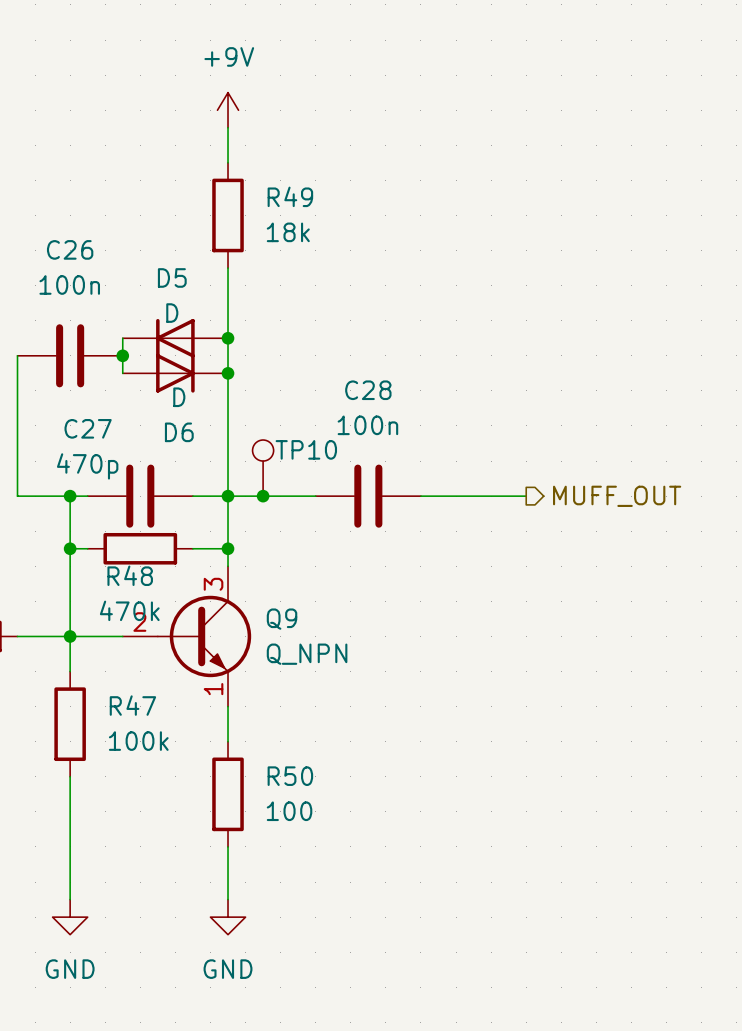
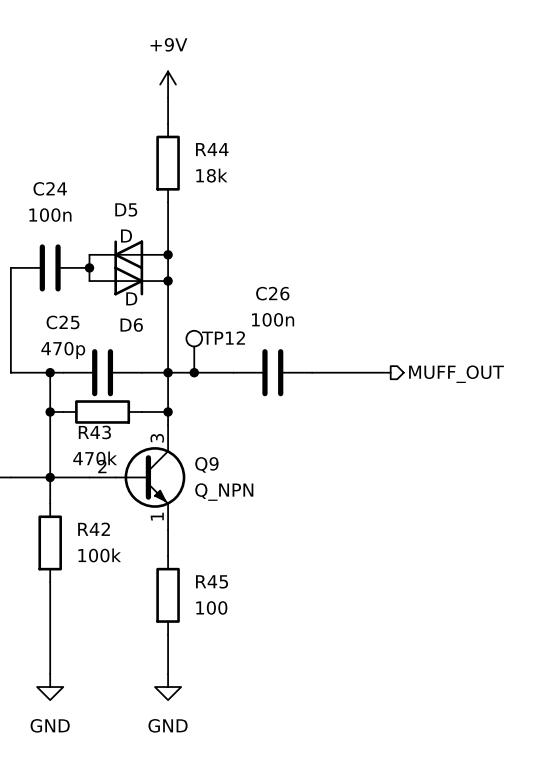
R49 name: R49 (290, 196) -> R44 (212, 149)
C26 name: C26 (70, 249) -> C24 (50, 188)
C28 name: C28 (368, 390) -> C26 (272, 293)
C27 name: C27 (88, 428) -> C25 (63, 322)
TP10 name: TP10 (306, 449) -> TP12 (223, 338)
R48 name: R48 (130, 575) -> R43 (94, 432)
R47 name: R47 (132, 705) -> R42 (94, 529)
R50 name: R50 (290, 776) -> R45 (212, 581)

